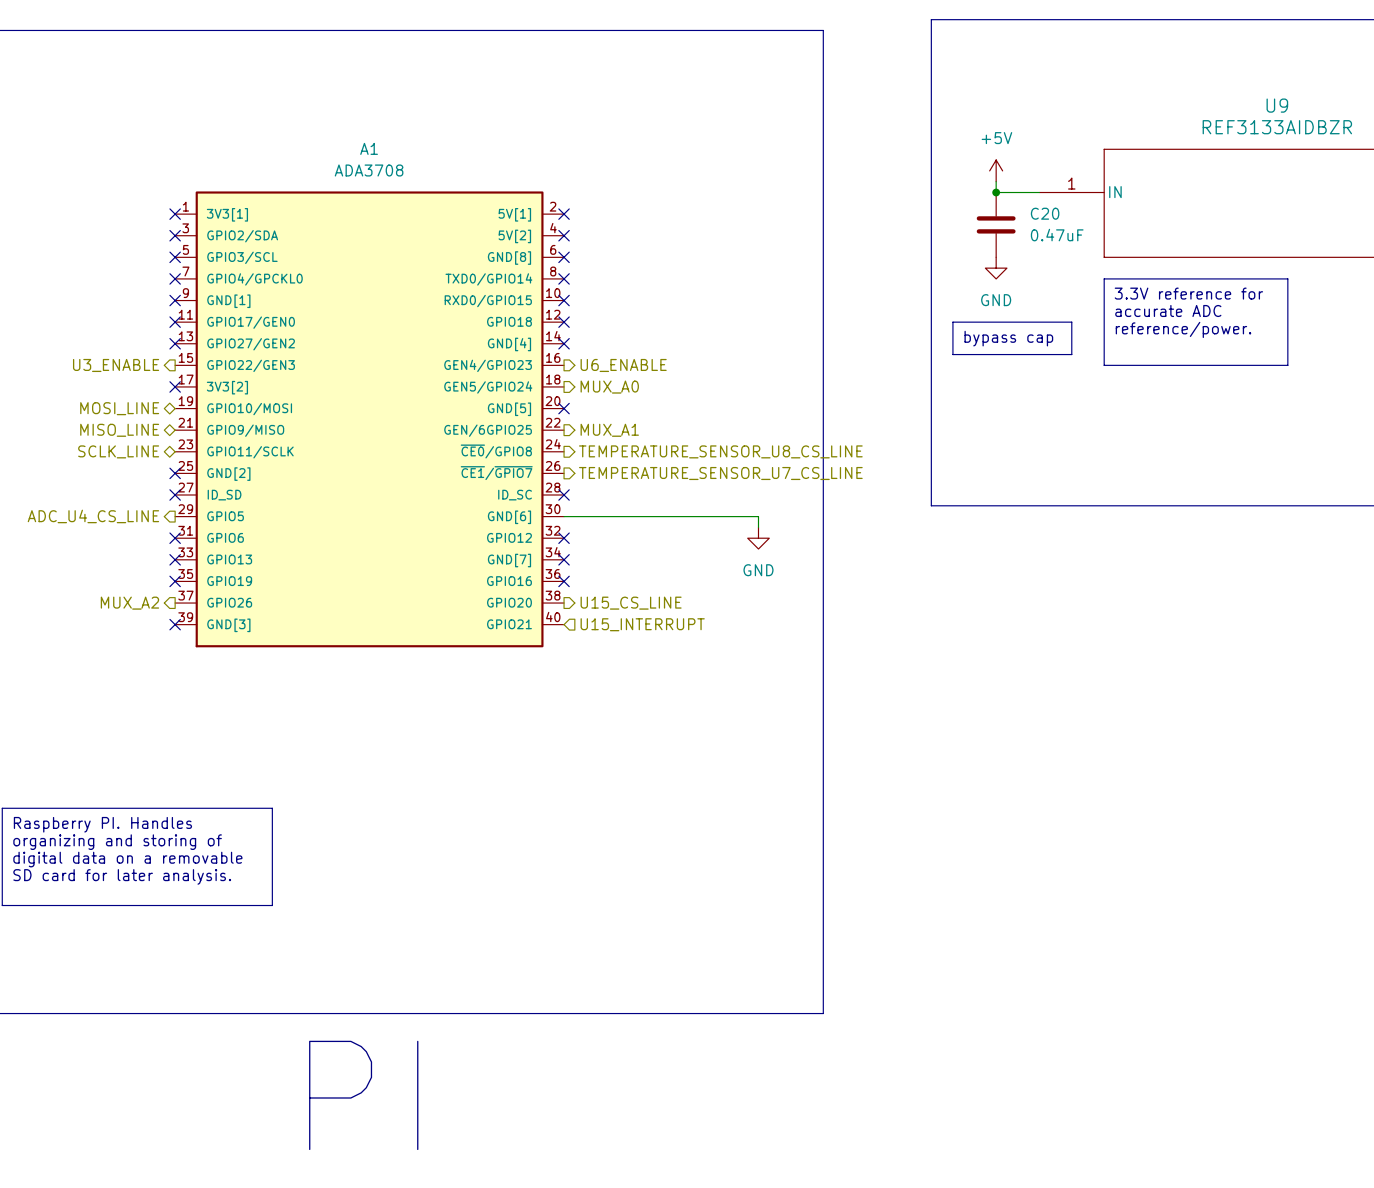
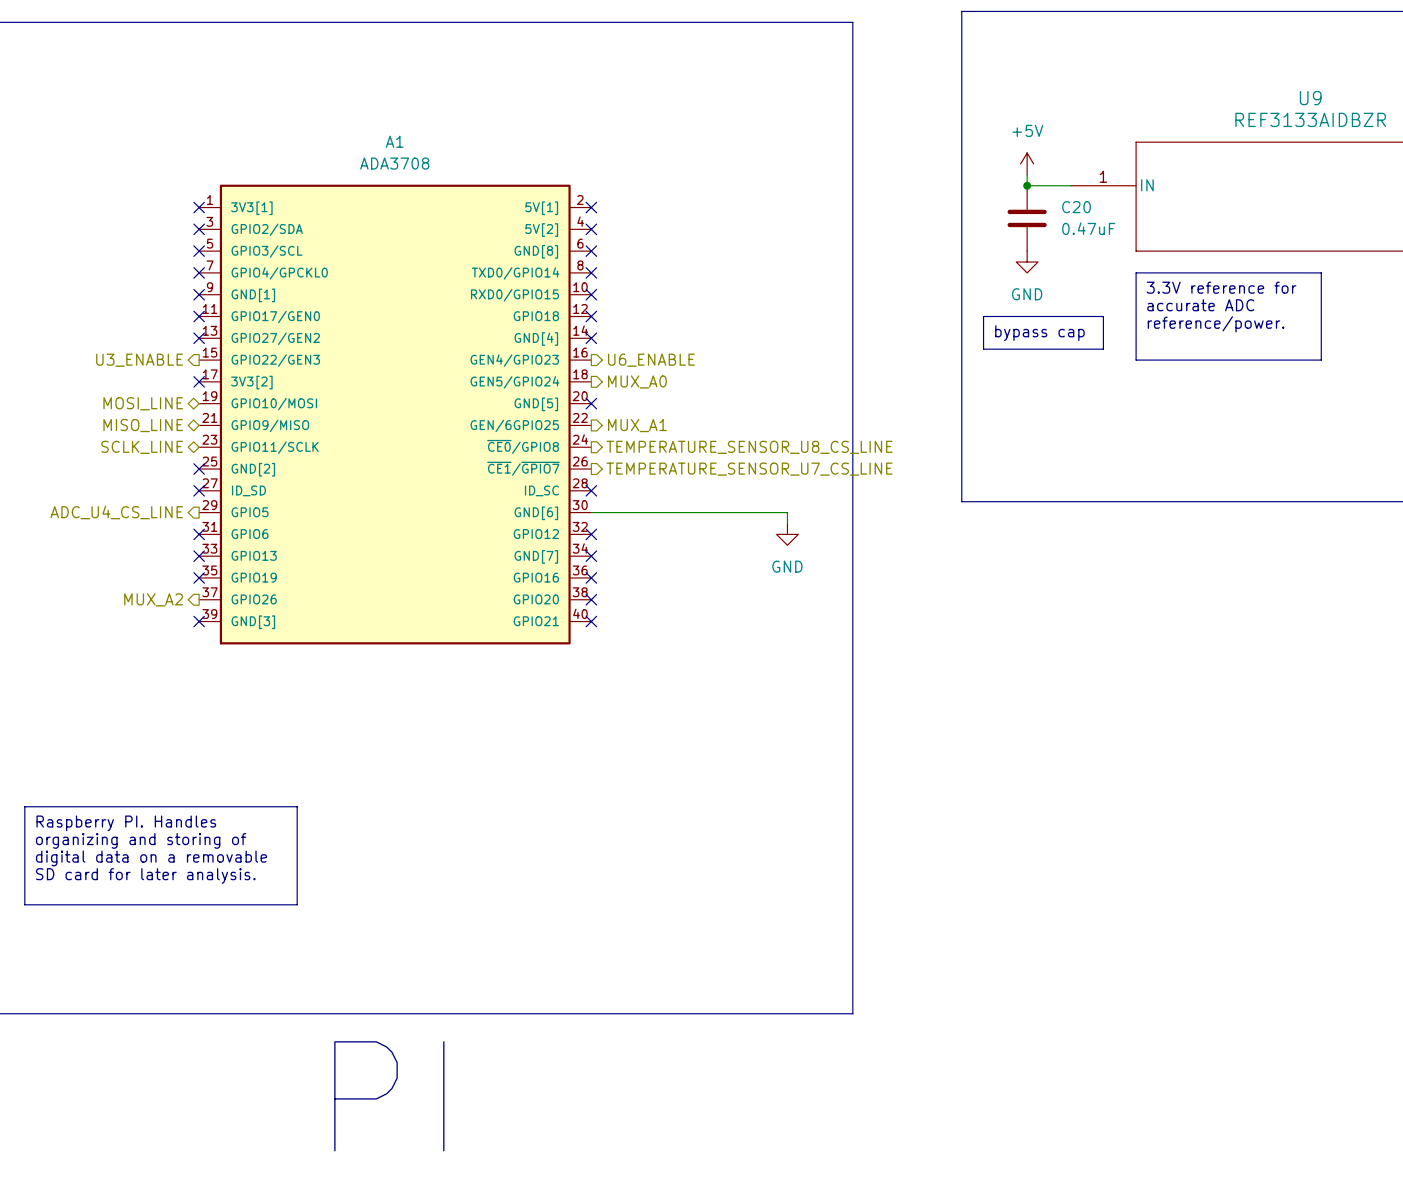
no-connect mark: none -> (591, 599)
hierarchical label: U15_CS_LINE (631, 603) -> none
no-connect mark: none -> (591, 621)
hierarchical label: U15_INTERRUPT (642, 624) -> none

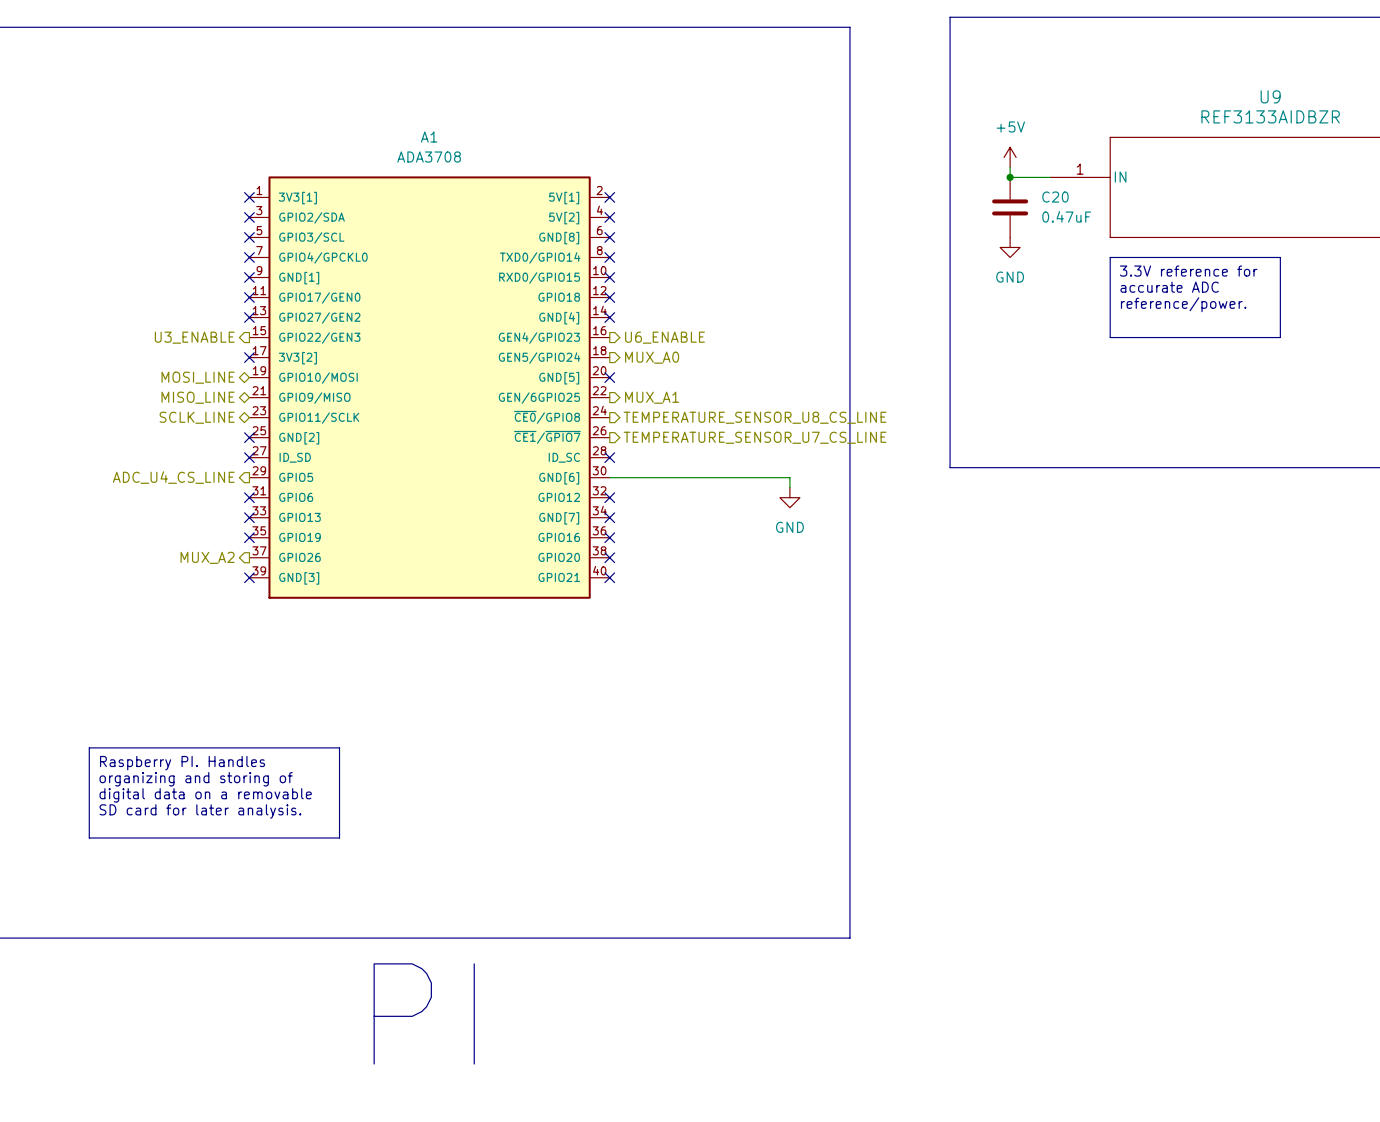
line: (983, 316) (1103, 316) (1103, 349) (983, 349) (983, 316) -> none
text: bypass cap (1039, 333) -> none

